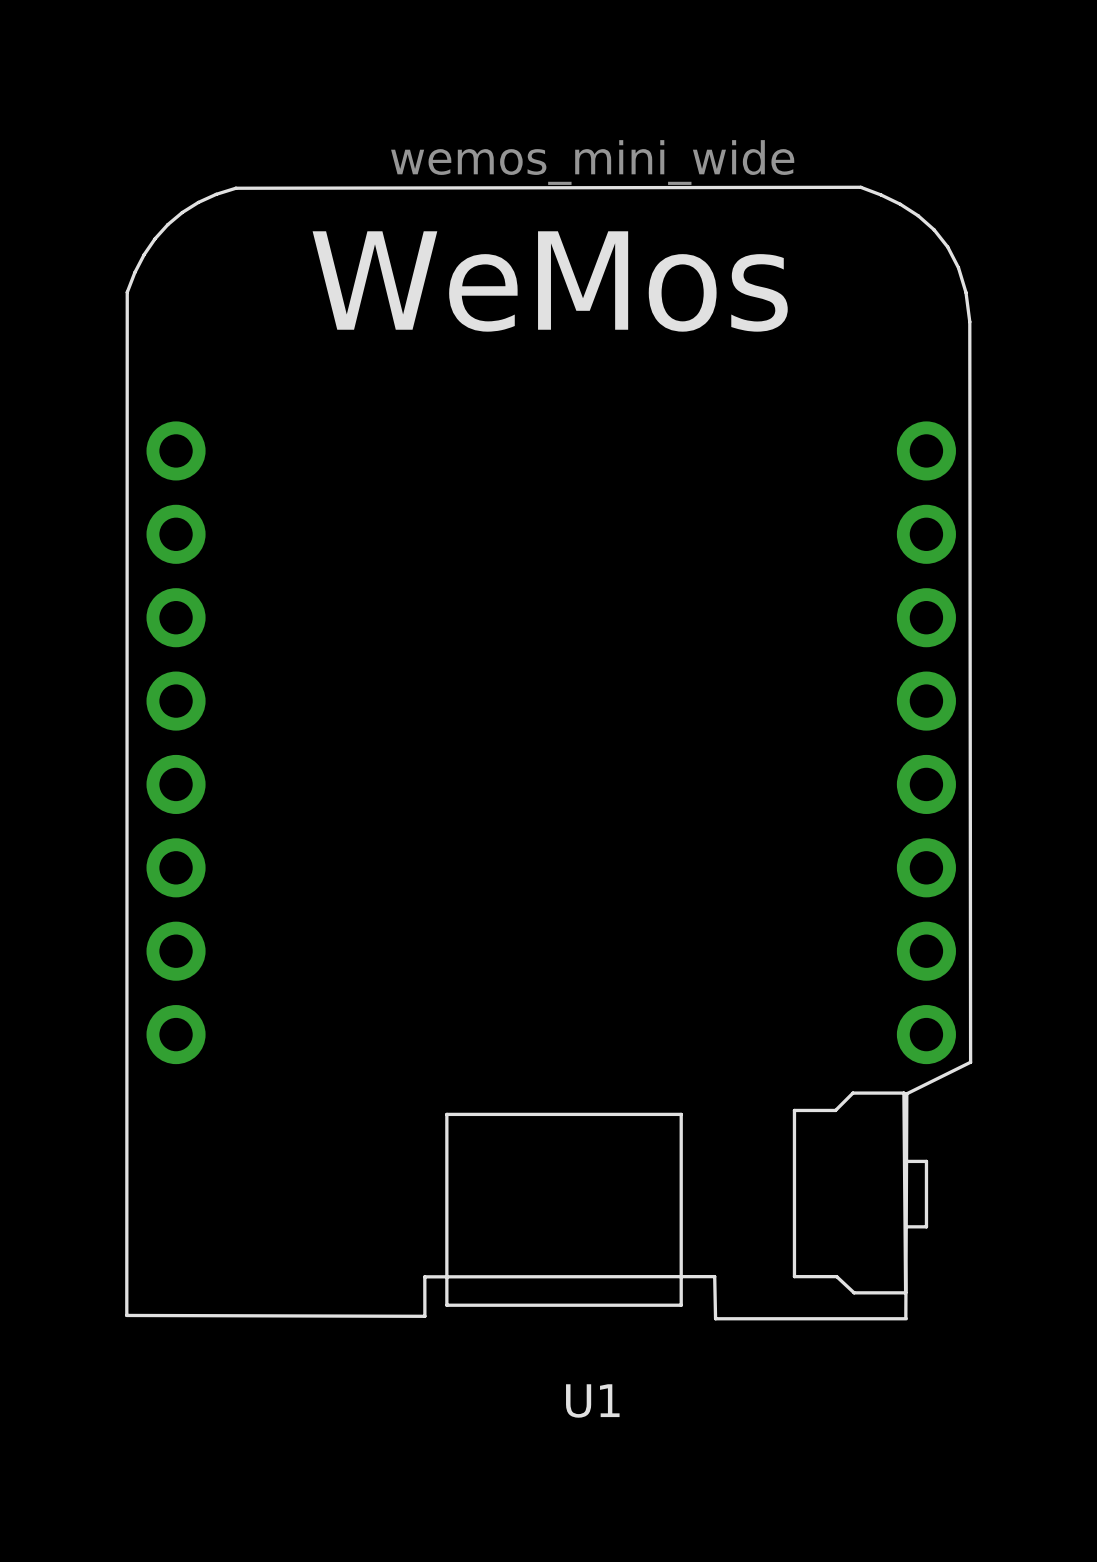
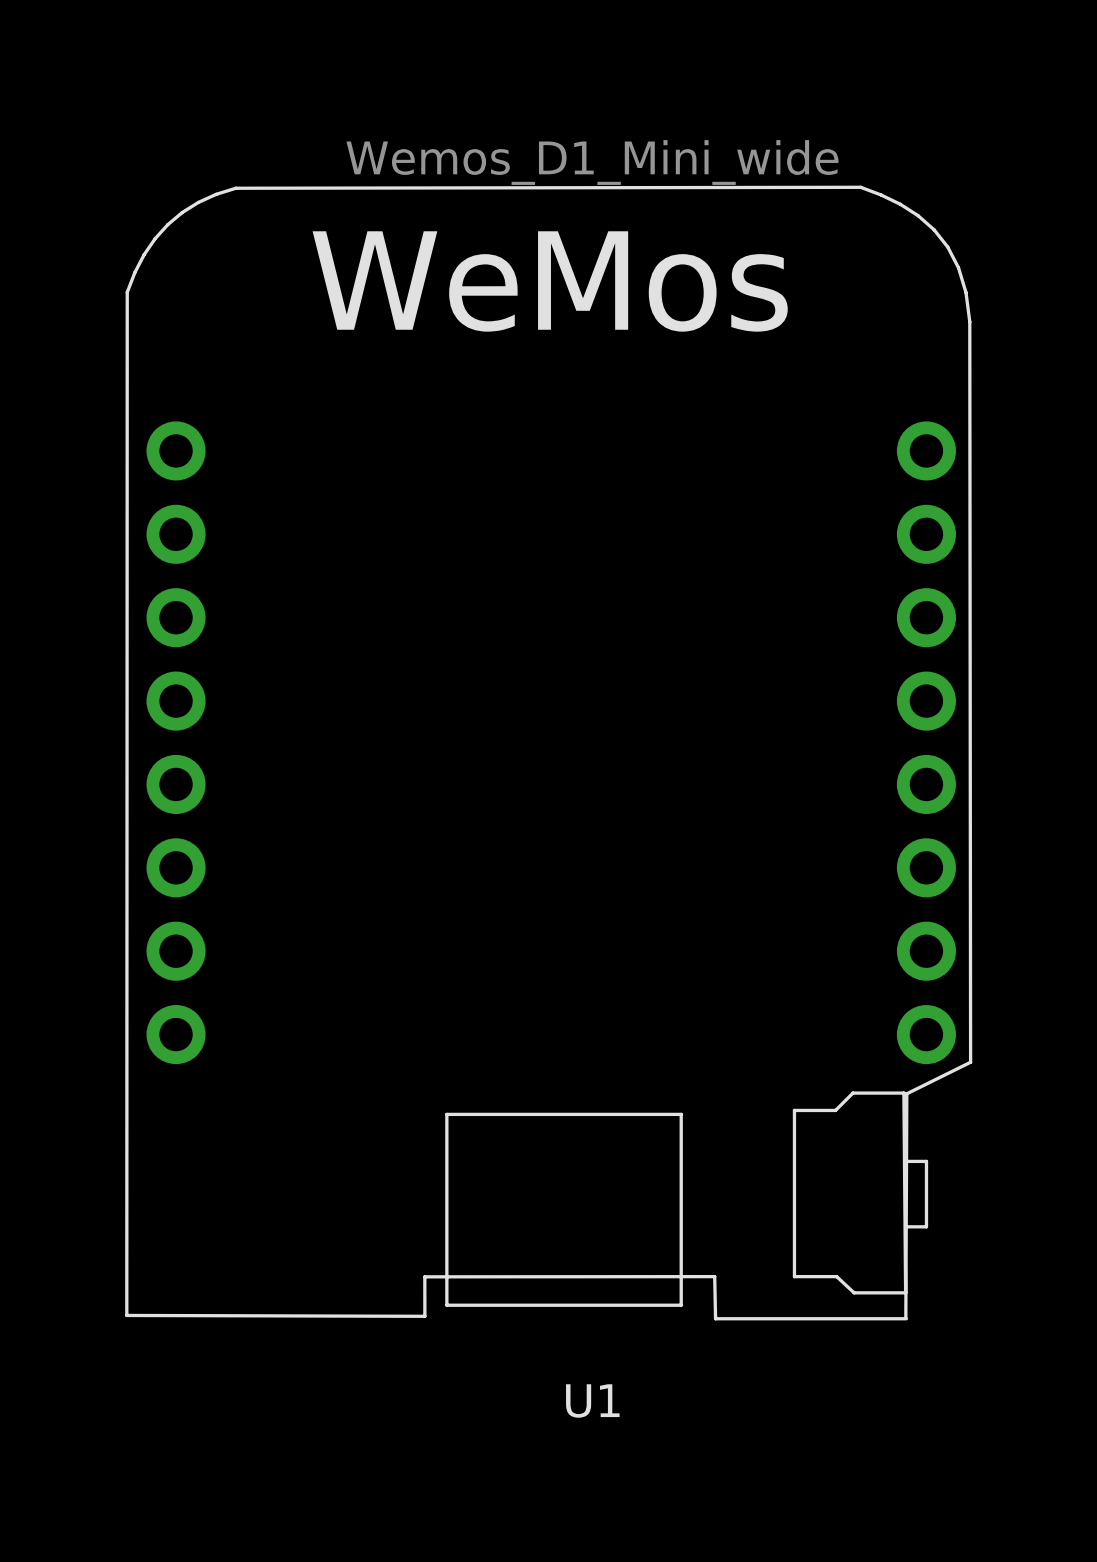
U1 value: wemos_mini_wide (592, 162) -> Wemos_D1_Mini_wide (592, 162)

